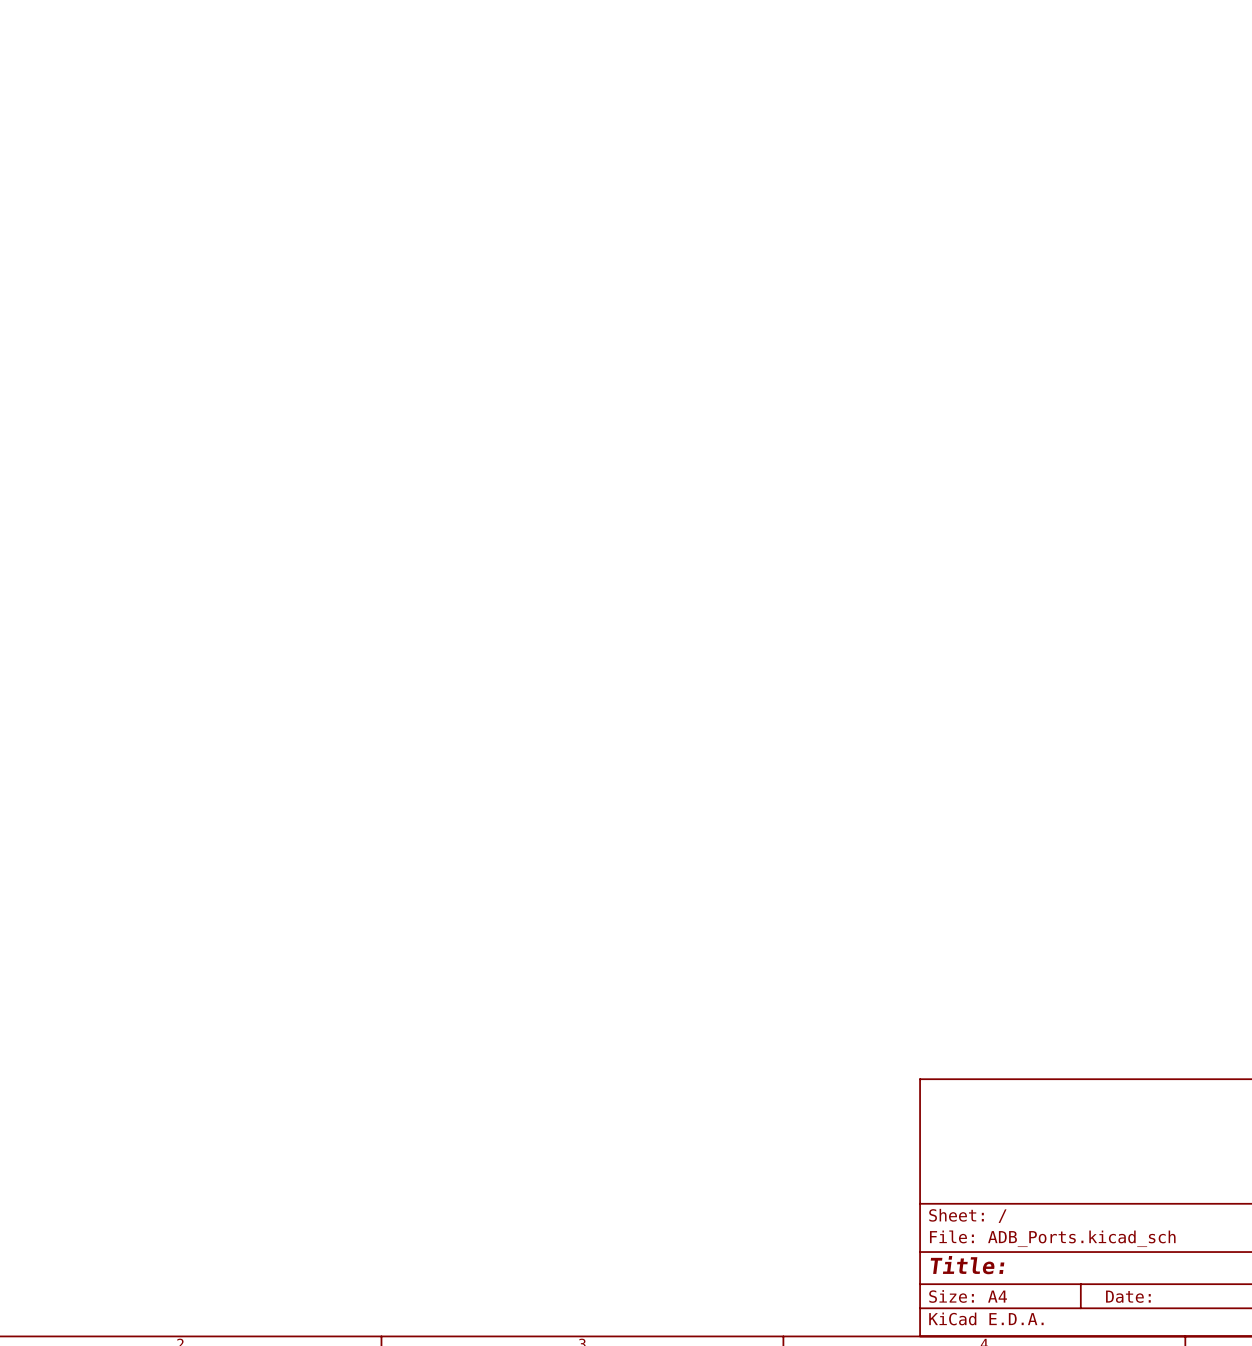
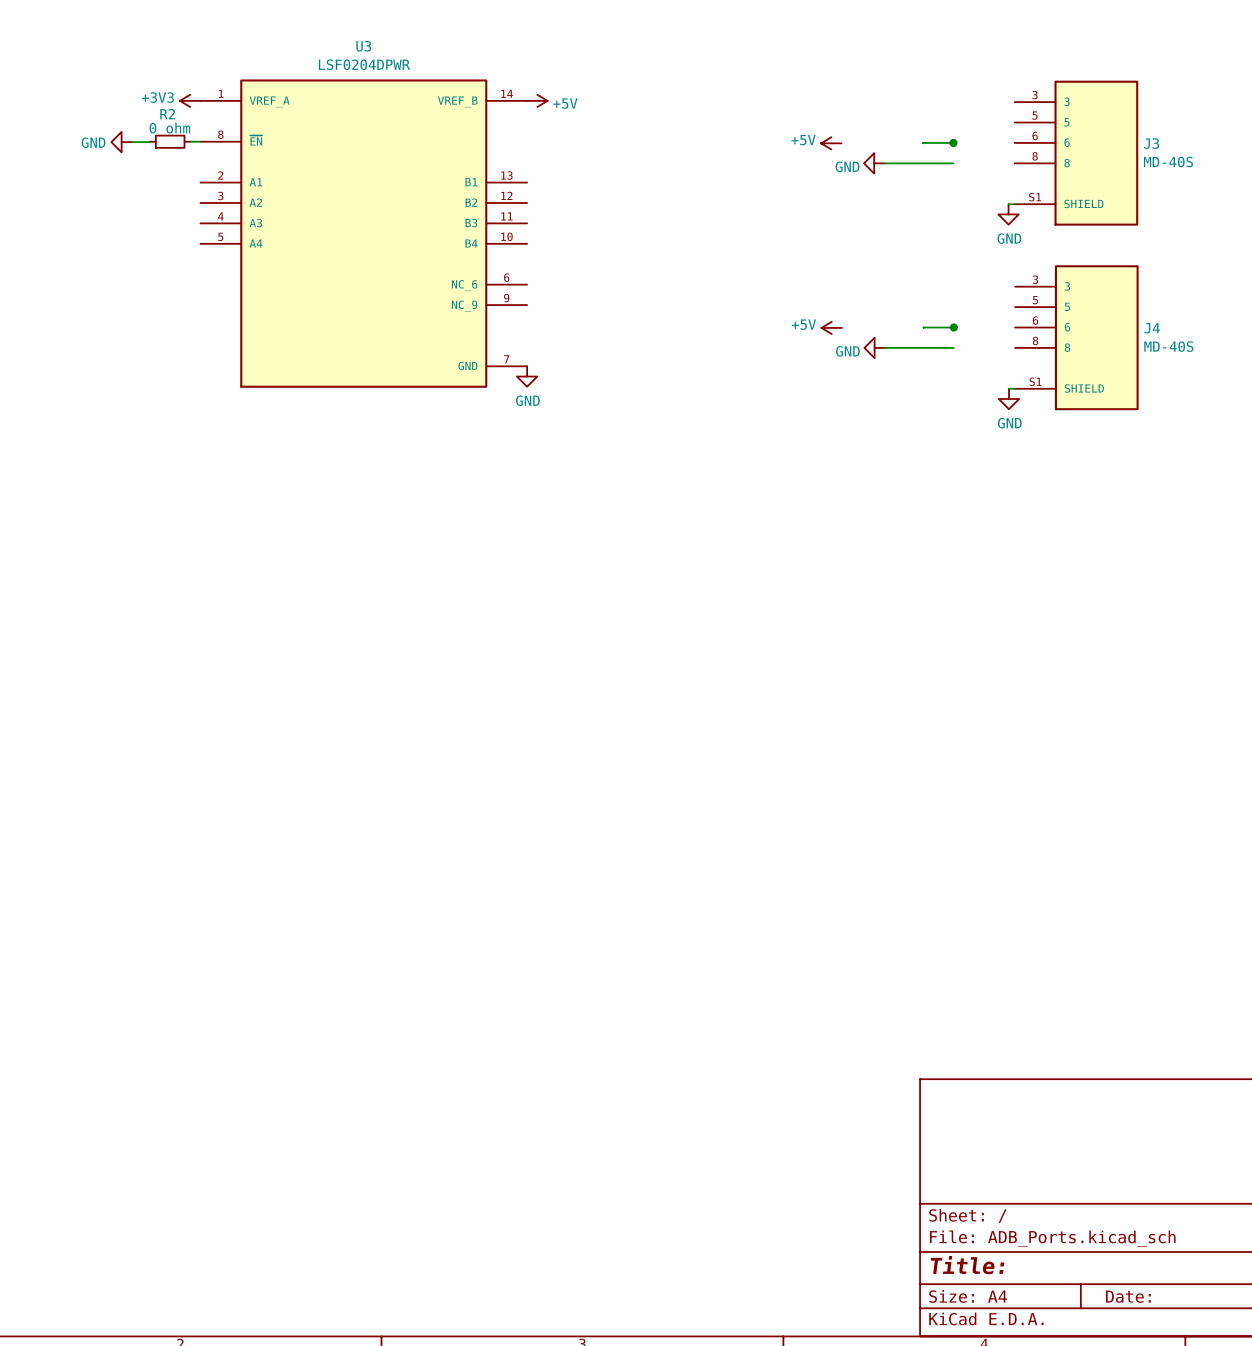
power symbol: none -> +3V3 (190, 100)
power symbol: none -> +5V (537, 100)
wire: none -> (149, 141) (131, 142)
R2: none -> 0 ohm (170, 141)
wire: none -> (190, 141) (200, 141)
power symbol: none -> GND (121, 142)
wire: none -> (953, 142) (923, 143)
junction: none -> (953, 142)
power symbol: none -> +5V (831, 143)
J3: none -> MD-40S (1076, 153)
power symbol: none -> GND (874, 163)
wire: none -> (884, 163) (953, 163)
wire: none -> (1008, 204) (1014, 204)
power symbol: none -> GND (1008, 214)
U3: none -> LSF0204DPWR (363, 233)
power symbol: none -> +5V (831, 327)
junction: none -> (953, 327)
wire: none -> (954, 327) (923, 327)
J4: none -> MD-40S (1076, 337)
power symbol: none -> GND (874, 347)
wire: none -> (884, 347) (953, 347)
power symbol: none -> GND (527, 376)
wire: none -> (1008, 388) (1015, 388)
power symbol: none -> GND (1008, 398)

